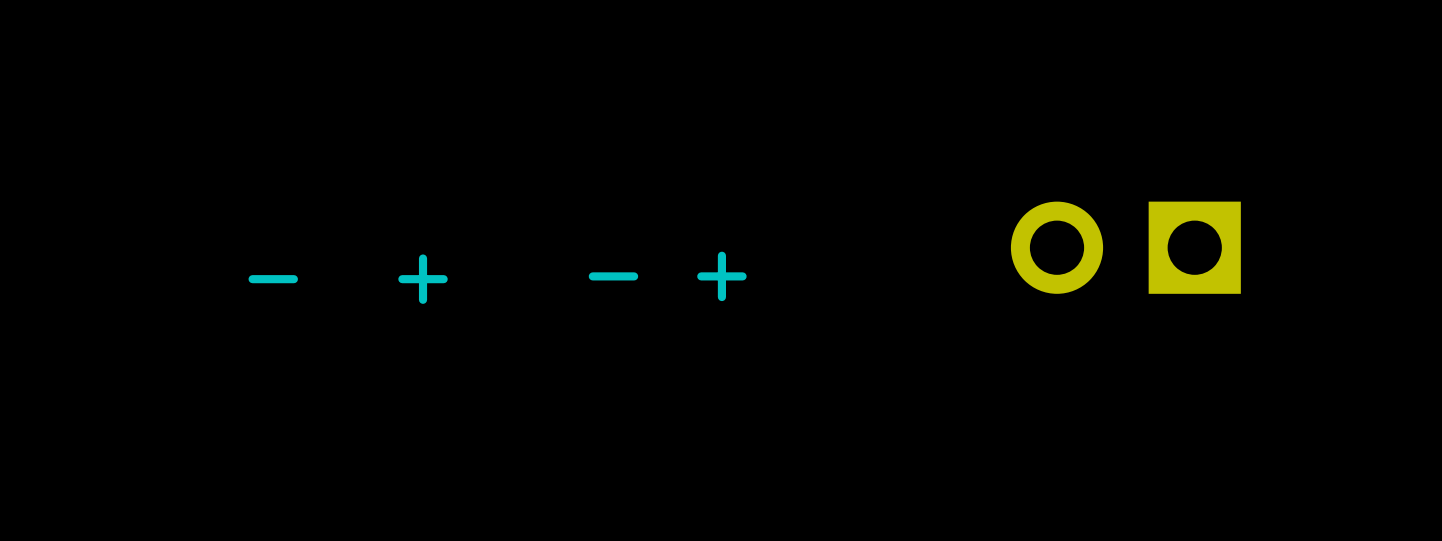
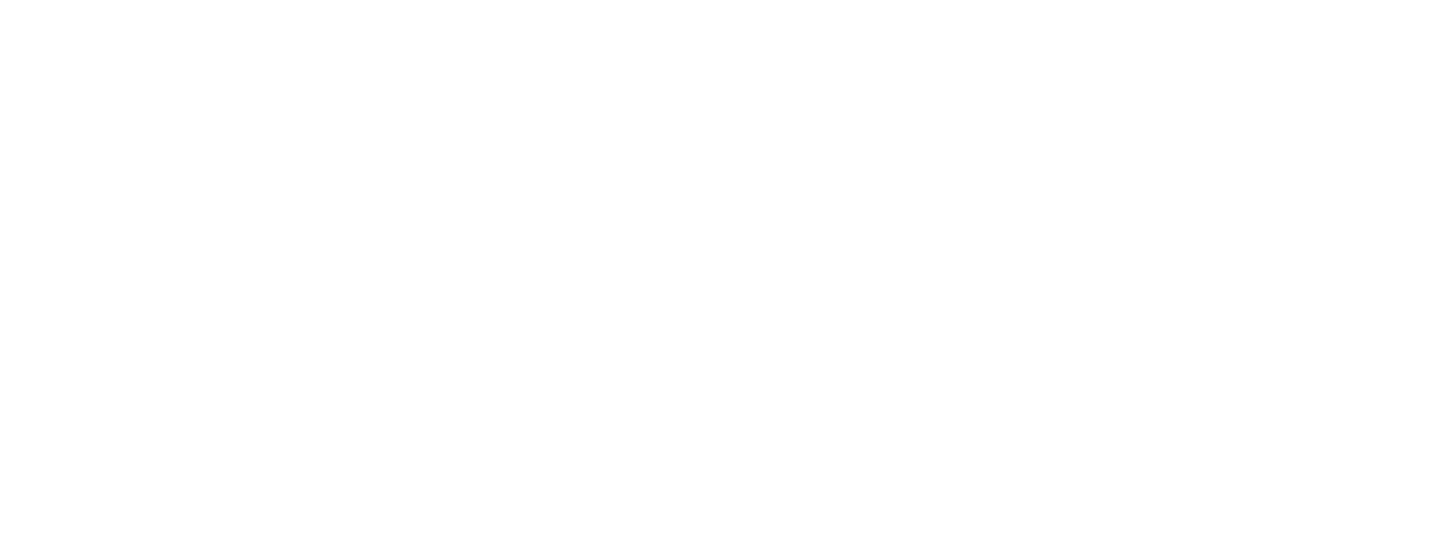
part: (1125, 247) -> none
text: + - (667, 276) -> none
text: + - (348, 279) -> none

